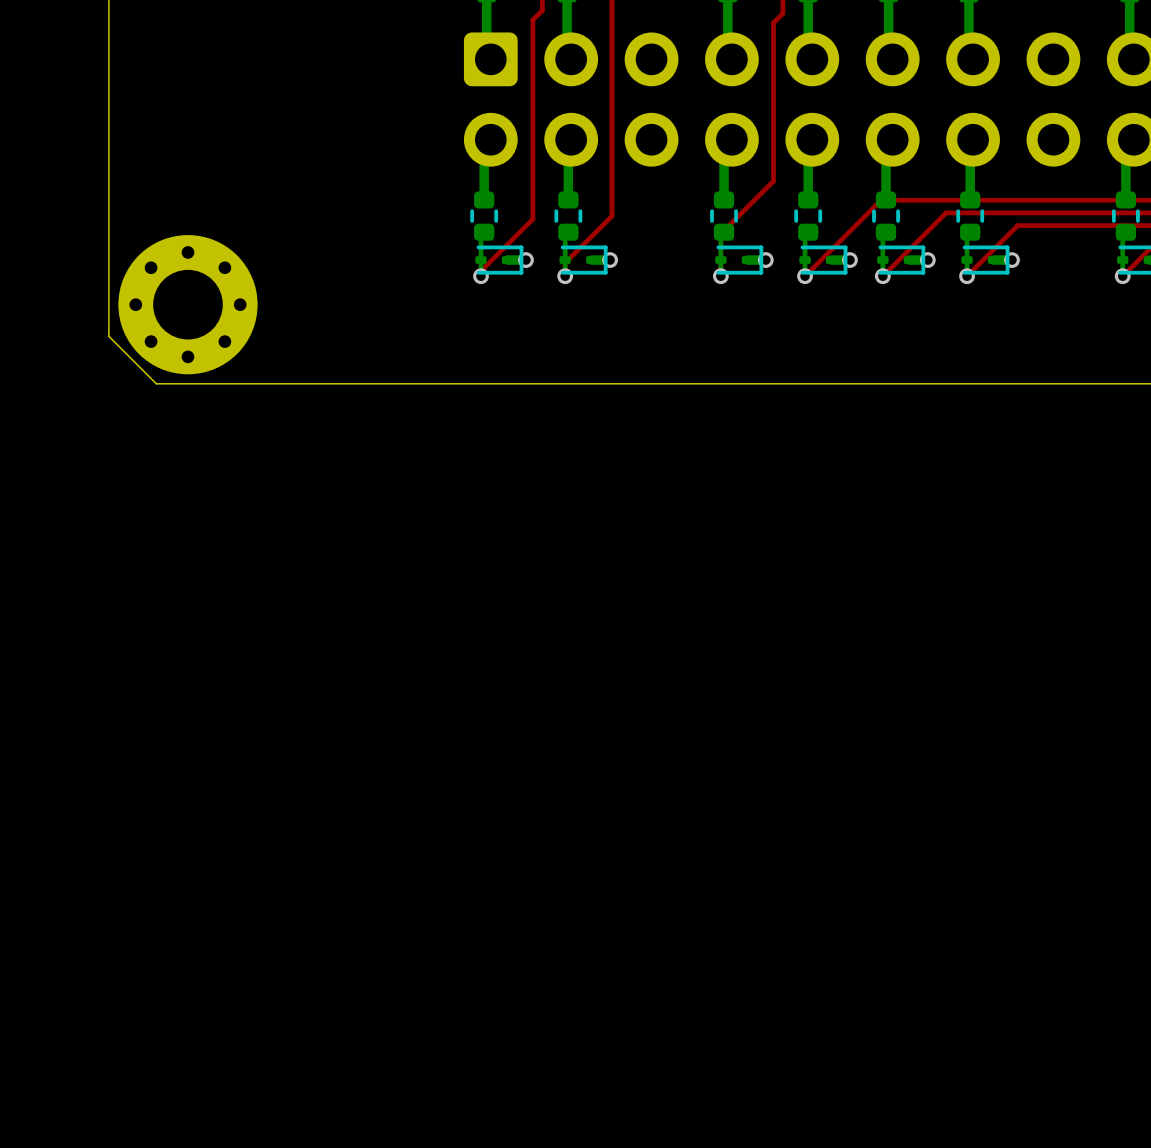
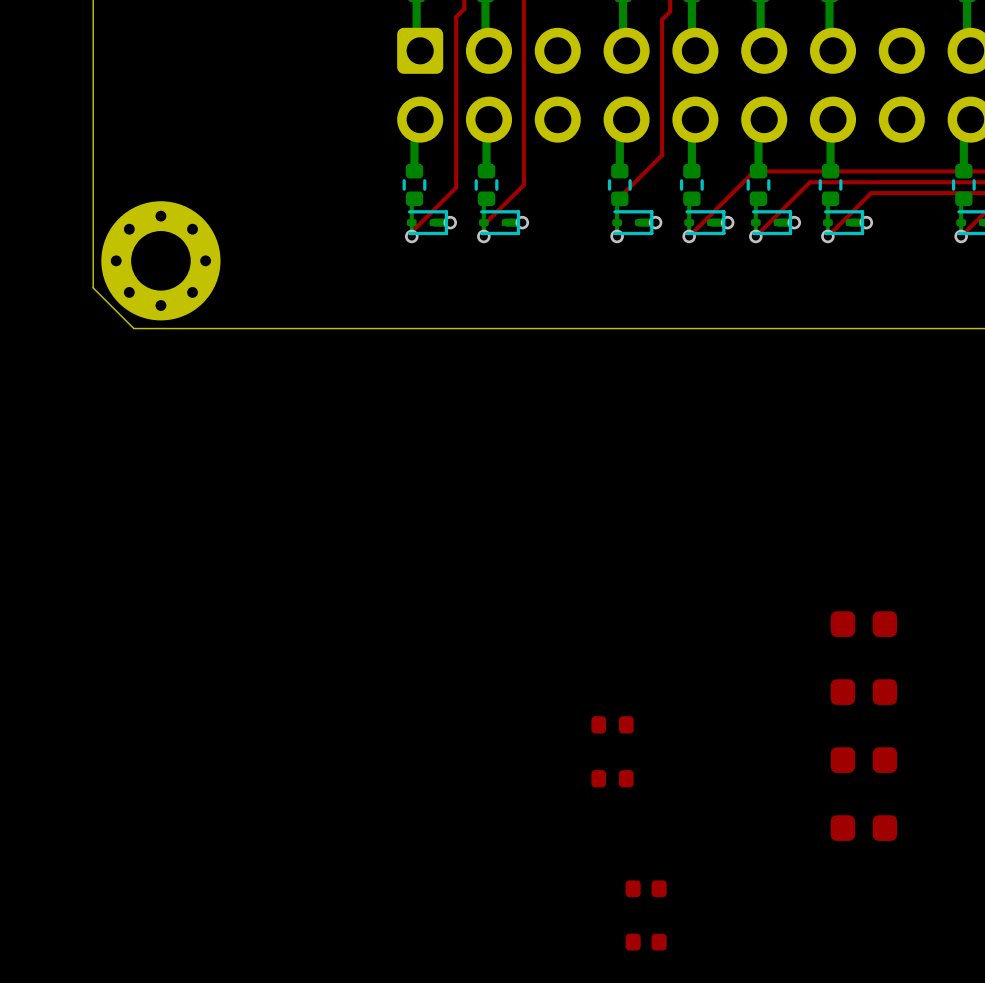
part: none -> (863, 624)
part: none -> (863, 692)
part: none -> (612, 724)
part: none -> (863, 760)
part: none -> (612, 778)
part: none -> (863, 828)
part: none -> (646, 888)
part: none -> (646, 942)

